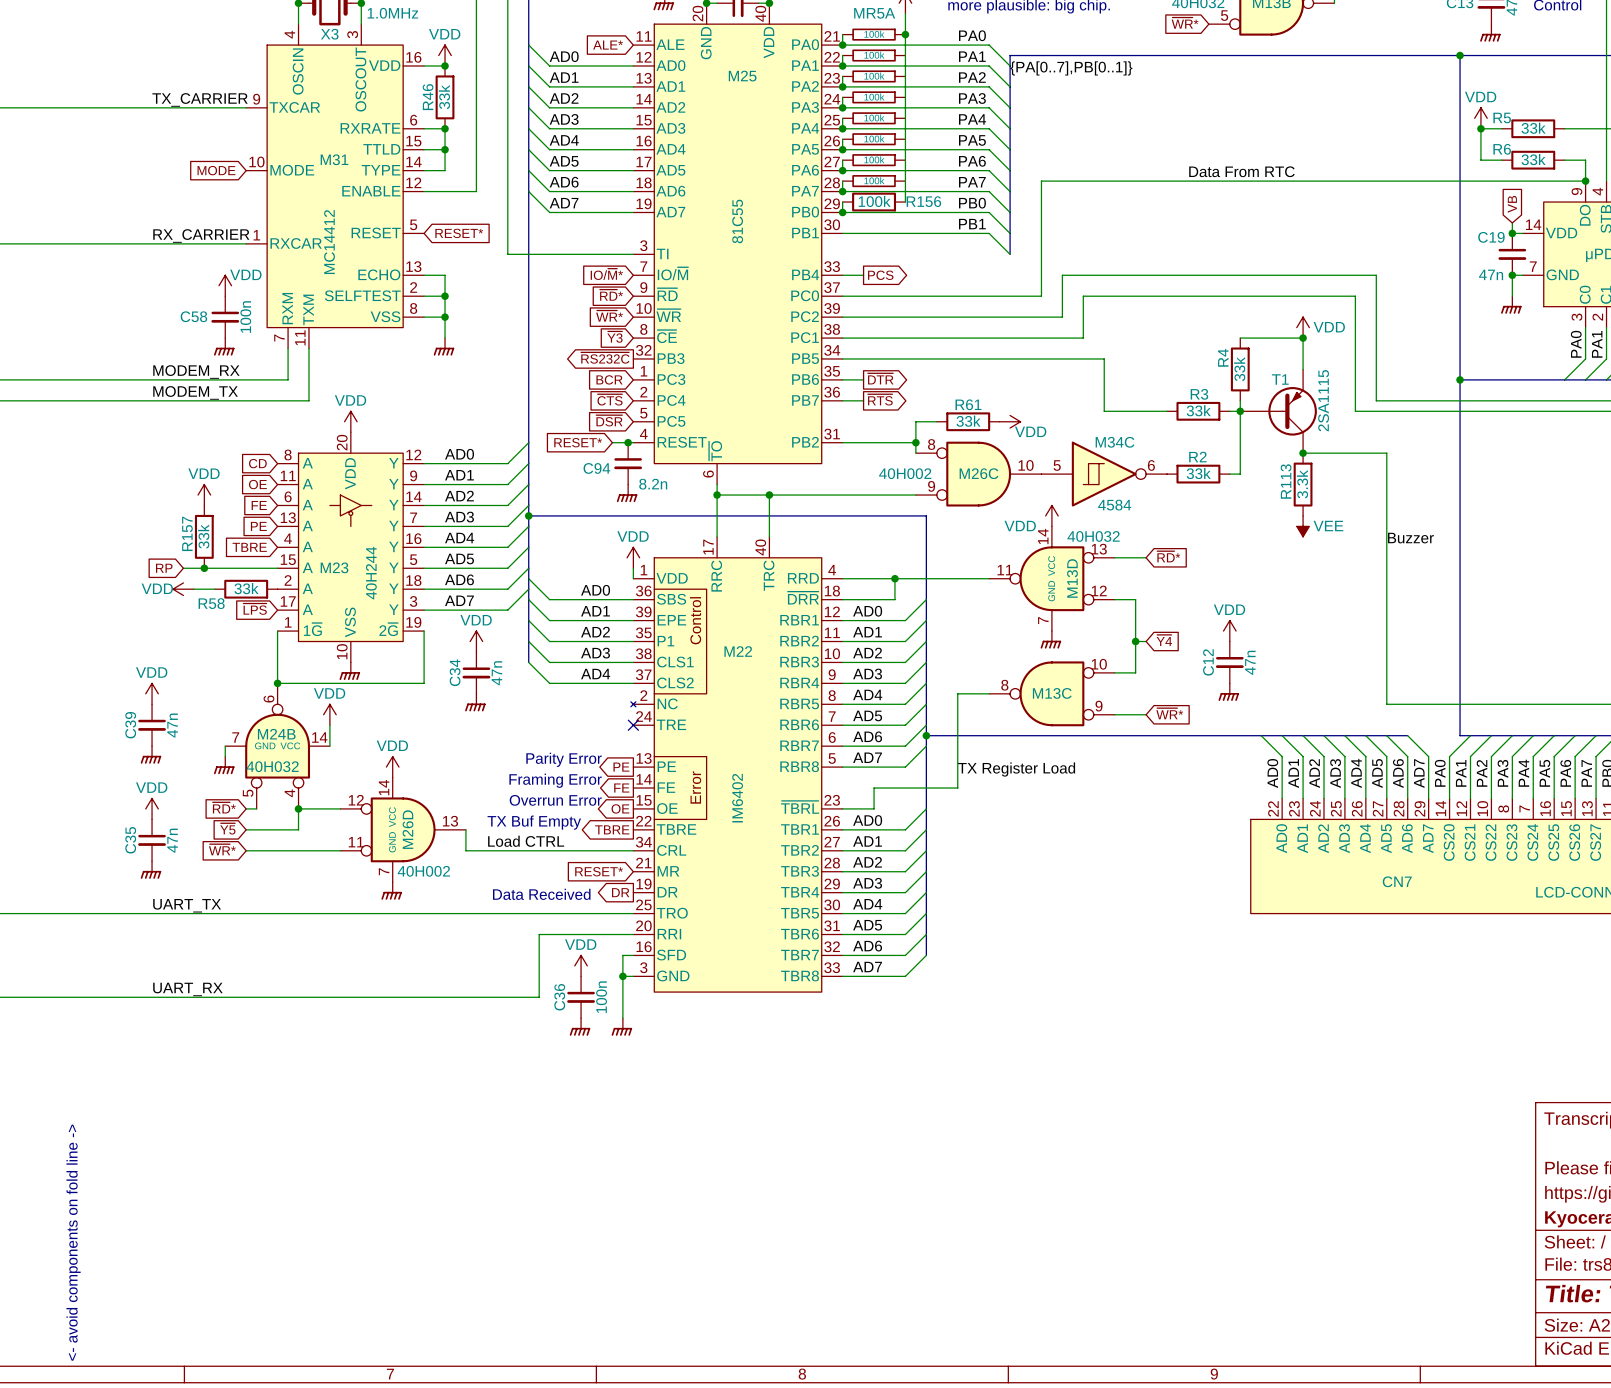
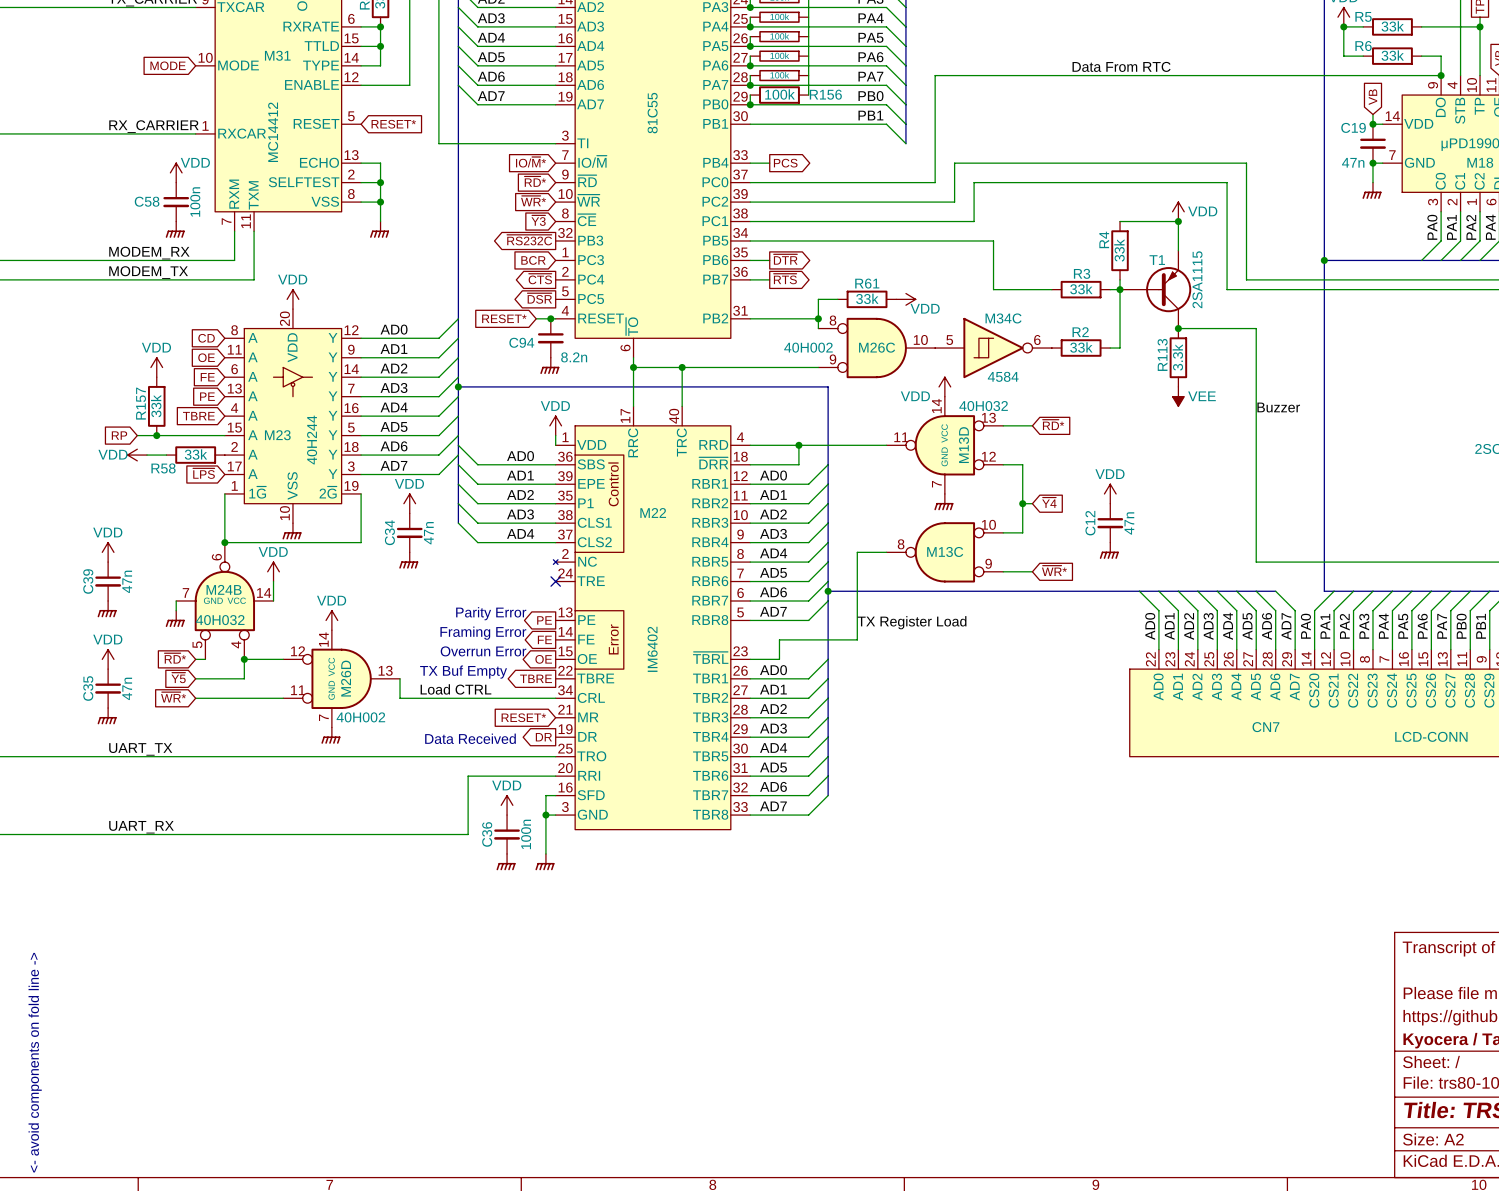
global label shape: input (610, 399) -> output (540, 279)
global label shape: input (609, 420) -> output (539, 298)

